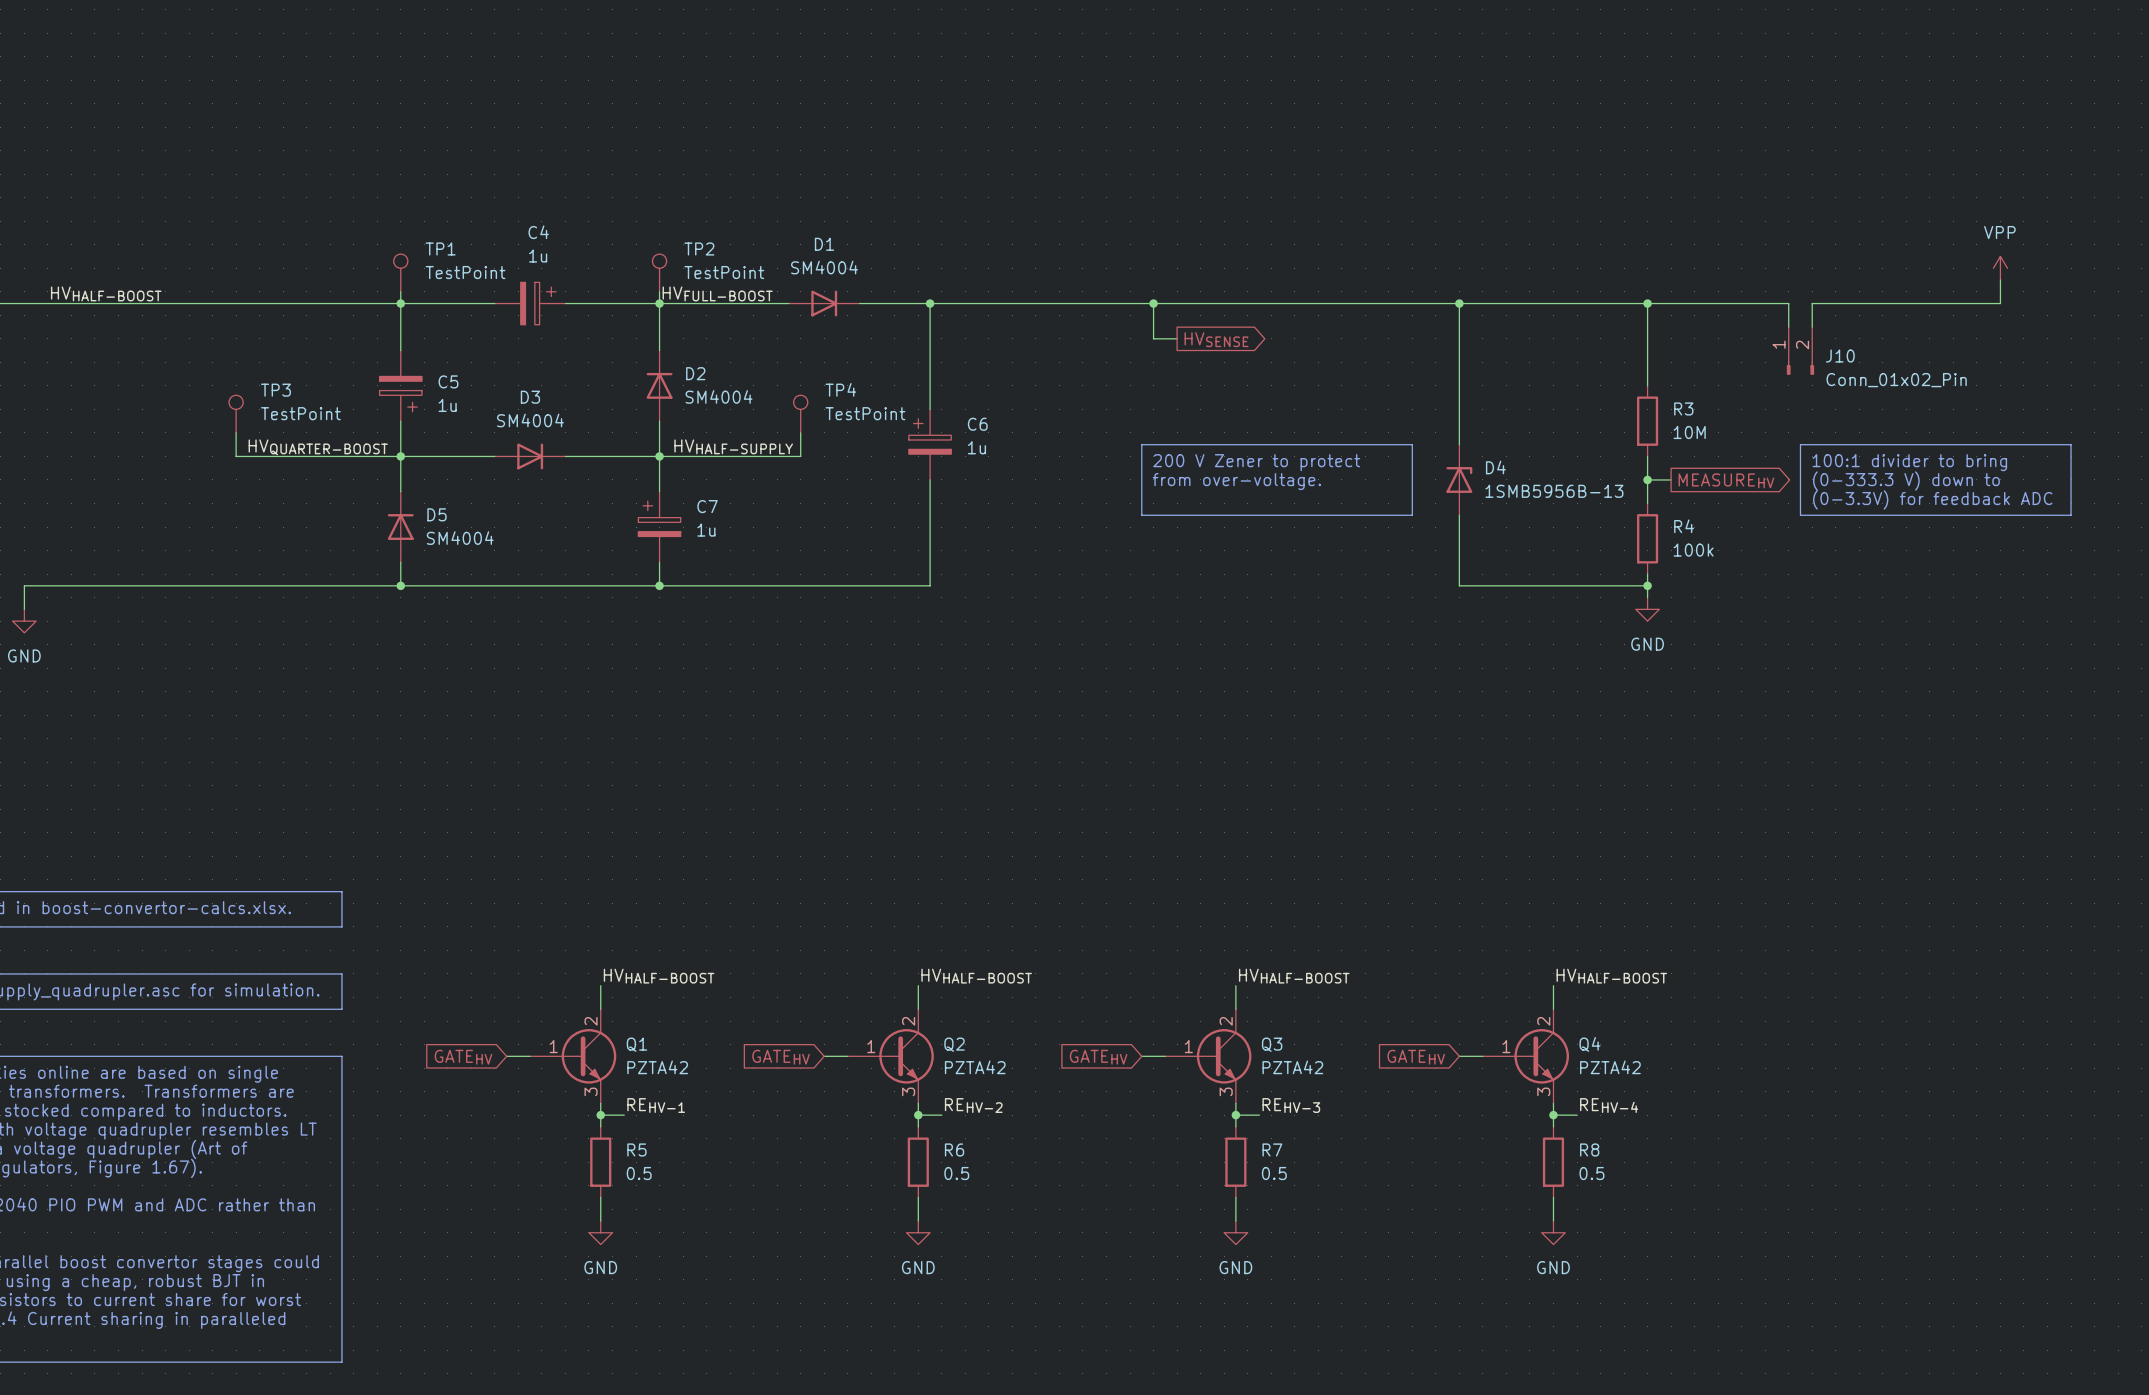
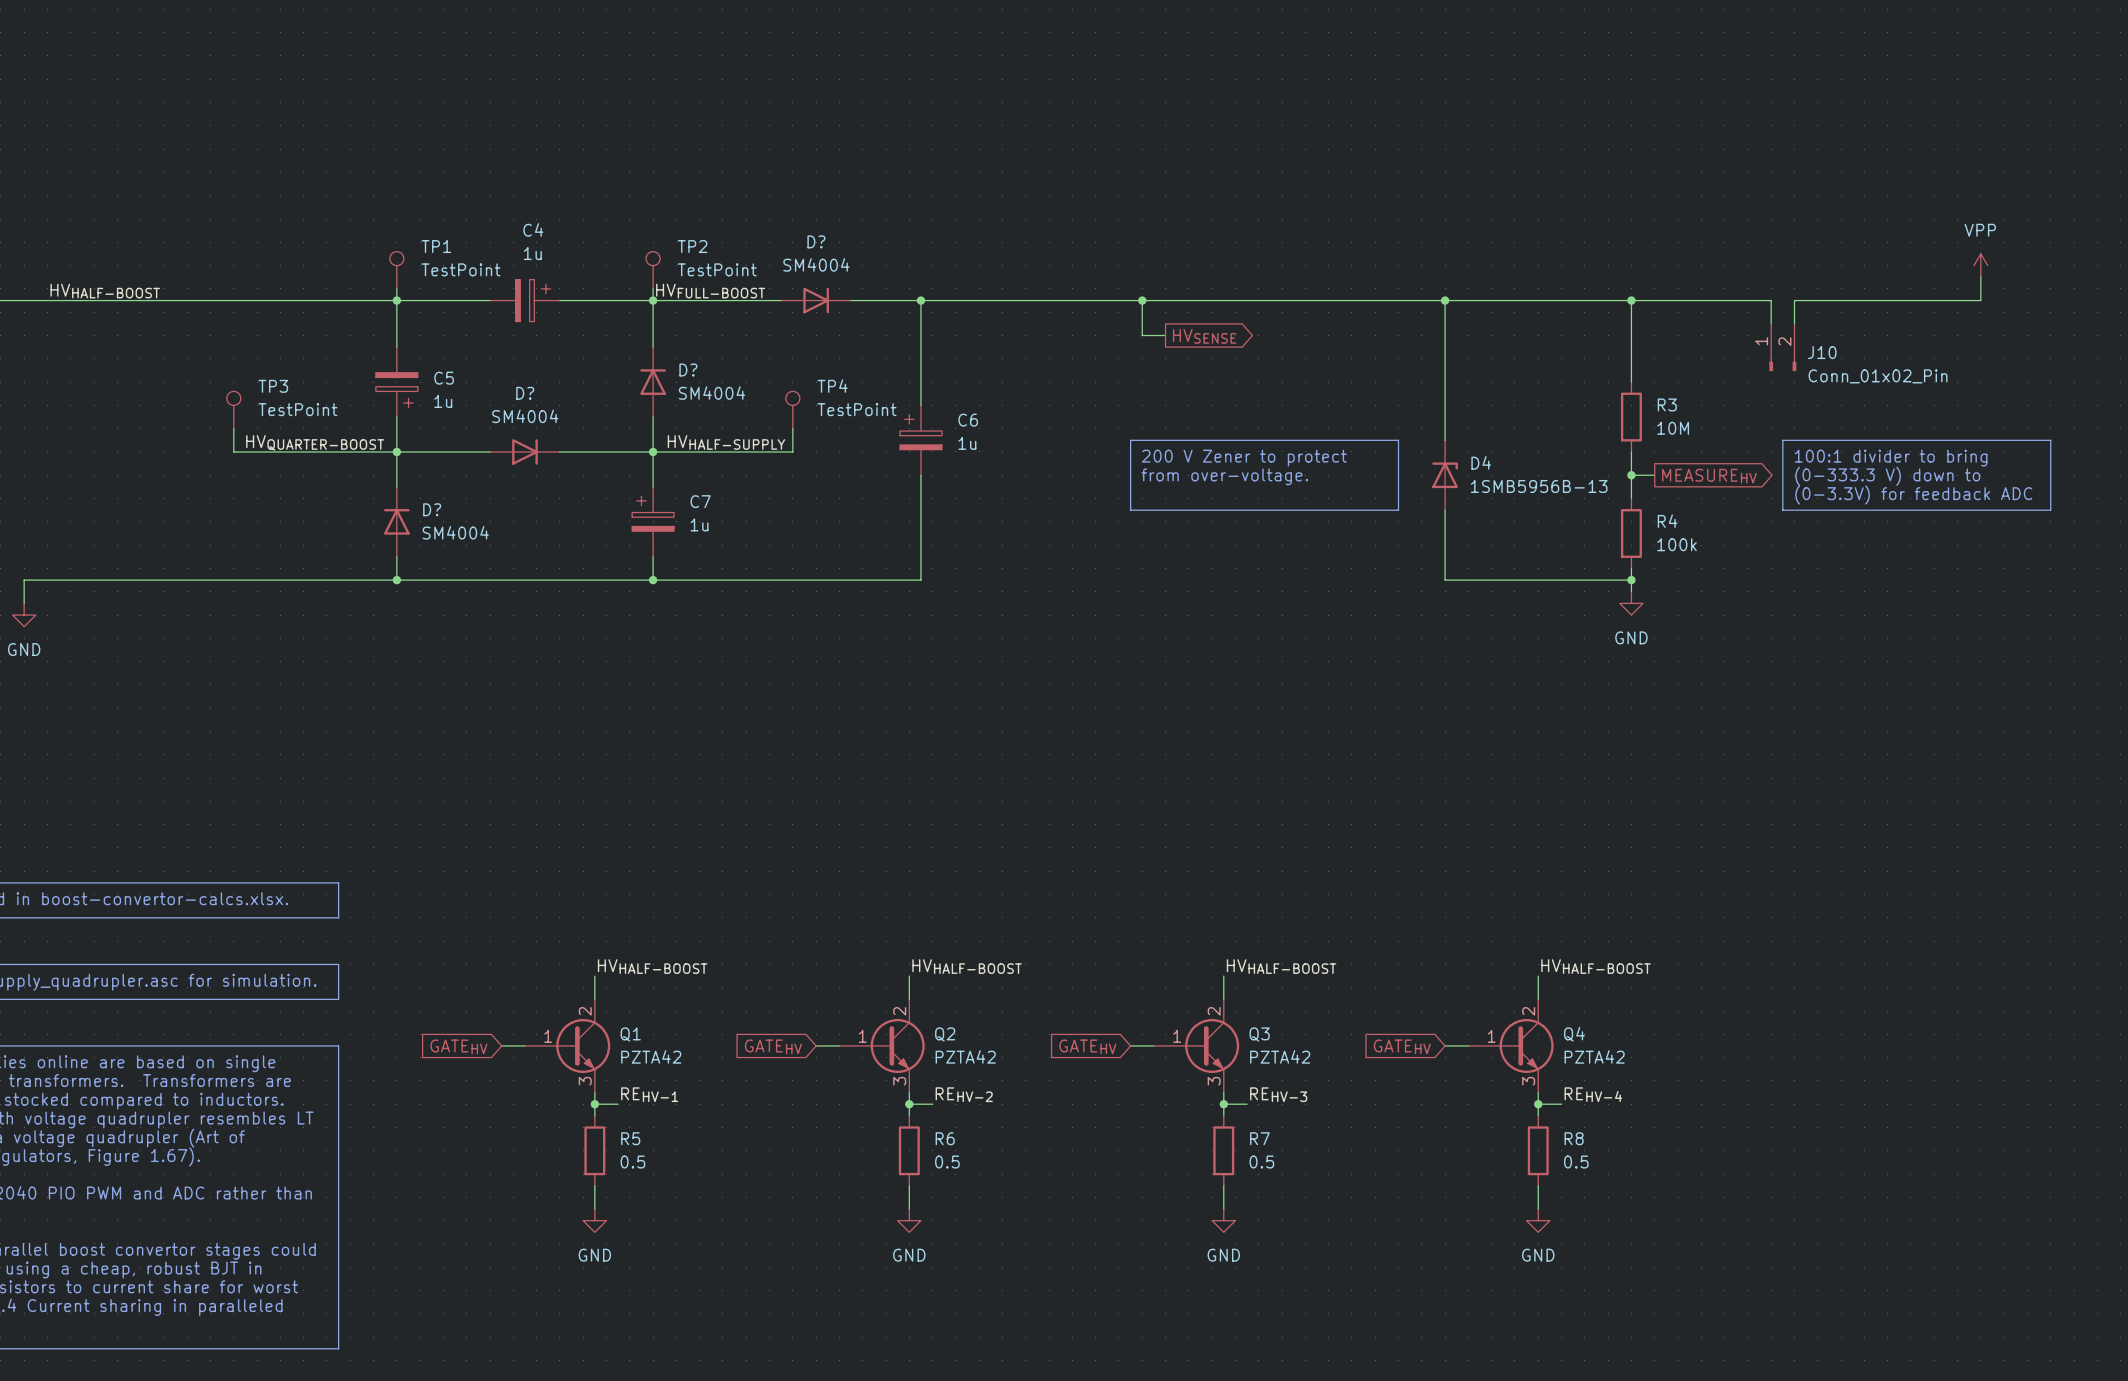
D1 name: D1 (824, 244) -> D? (816, 241)
D2 name: D2 (695, 373) -> D? (688, 370)
D3 name: D3 (530, 397) -> D? (525, 393)
D5 name: D5 (436, 514) -> D? (432, 509)

